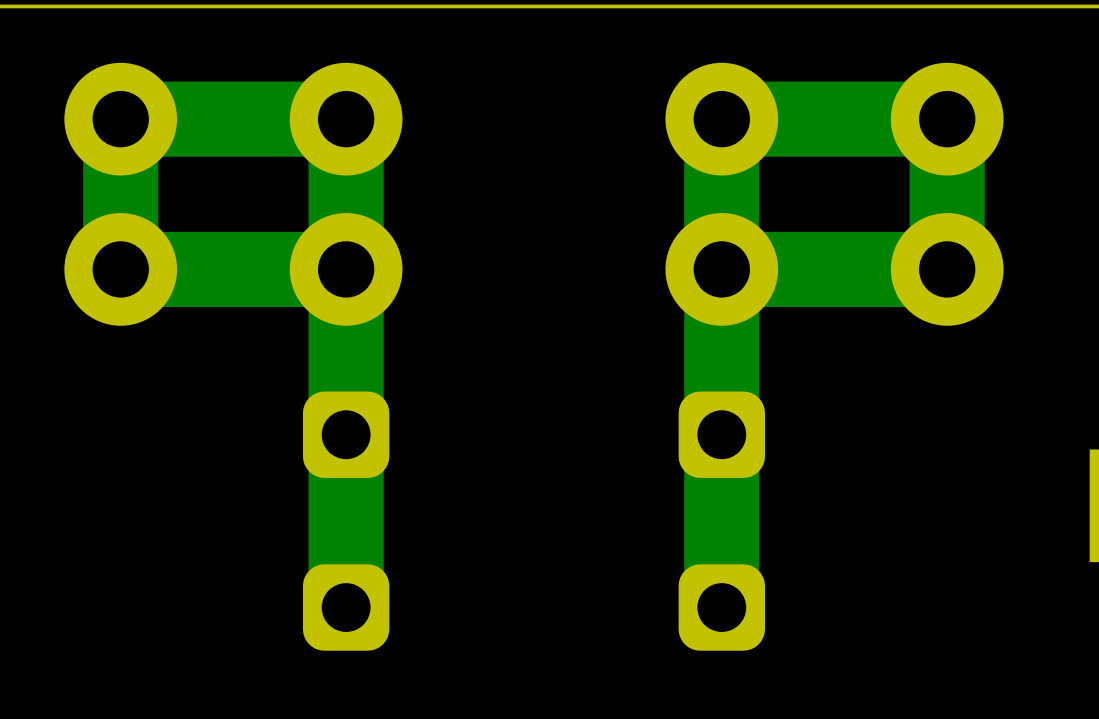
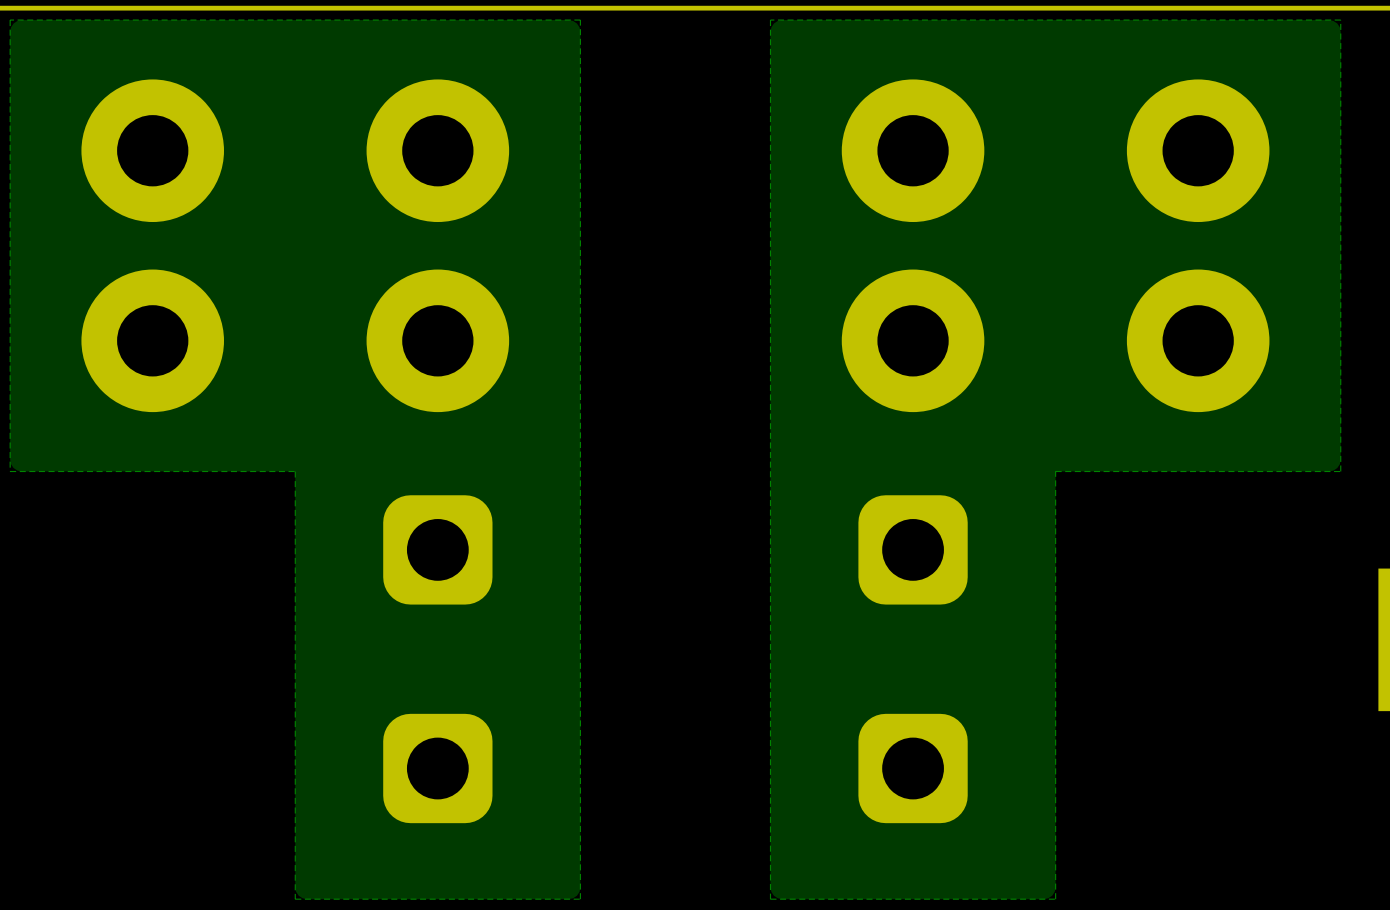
zone outline: none -> (580, 20) (10, 20) (10, 471) (295, 471) (295, 899) (580, 899) (580, 20)
zone outline: none -> (1340, 20) (770, 20) (770, 899) (1055, 899) (1055, 471) (1340, 471) (1340, 20)
track: (346, 269) (120, 269) (120, 119) (346, 119) (346, 607) -> none
track: (721, 269) (947, 269) (947, 119) (721, 119) (721, 607) -> none

